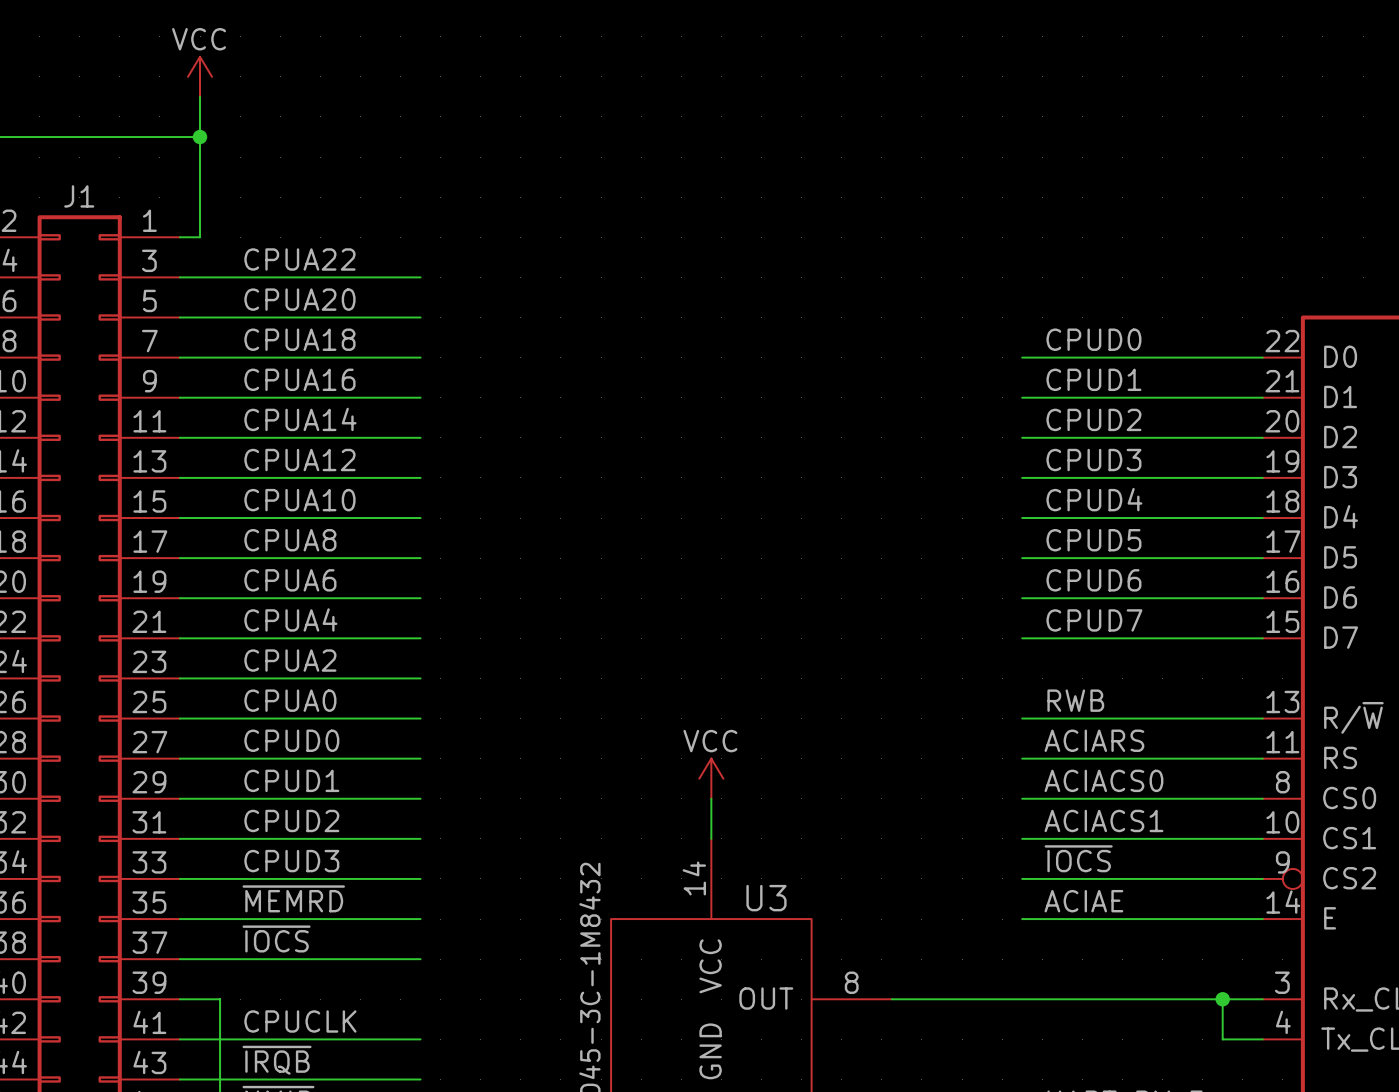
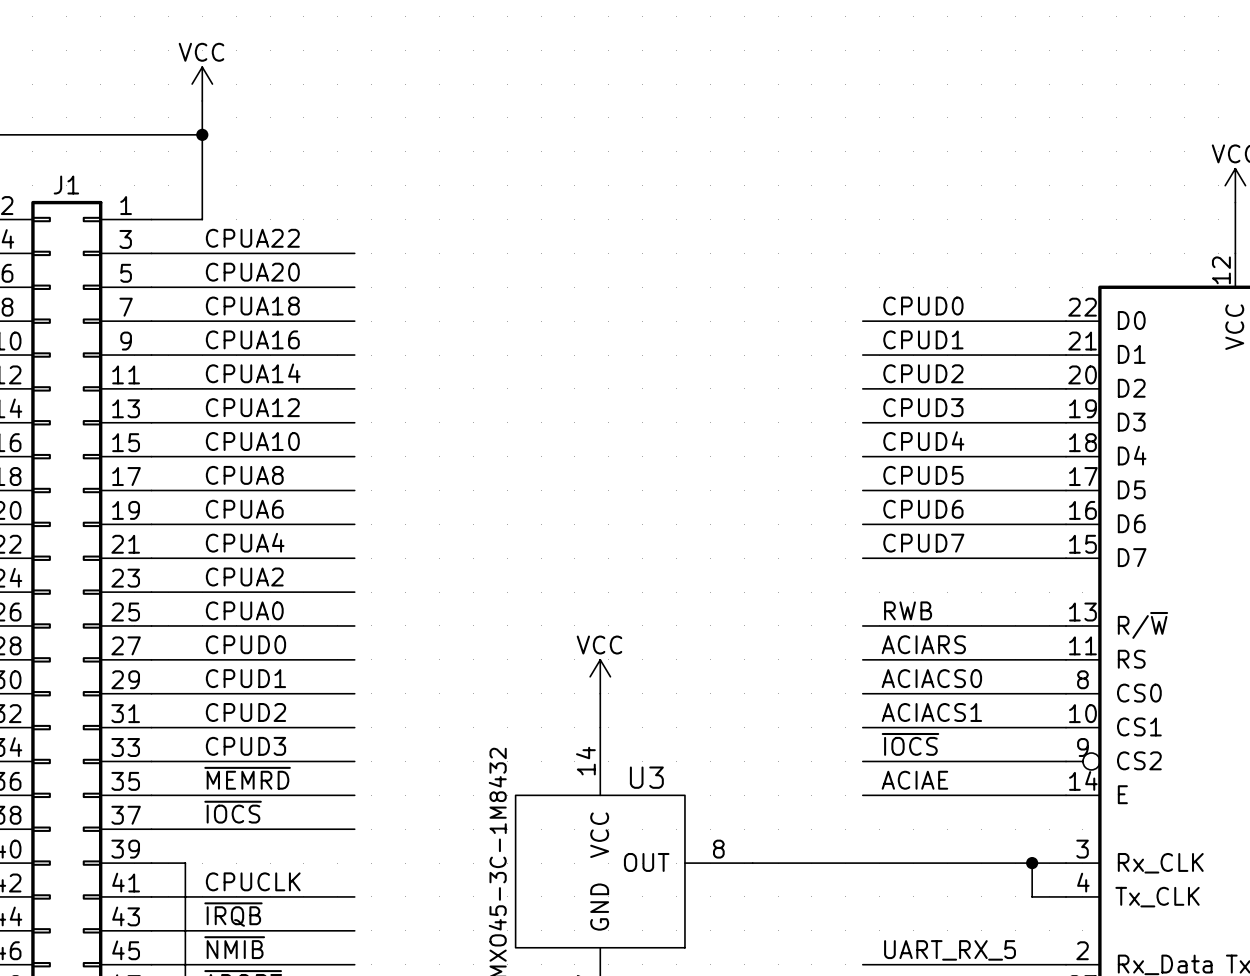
power symbol position: VCC (200, 76) -> VCC (202, 84)
wire: (200, 96) (200, 237) -> (202, 100) (202, 219) (168, 219)
wire: none -> (168, 134) (202, 134)
junction position: (200, 137) -> (202, 134)

